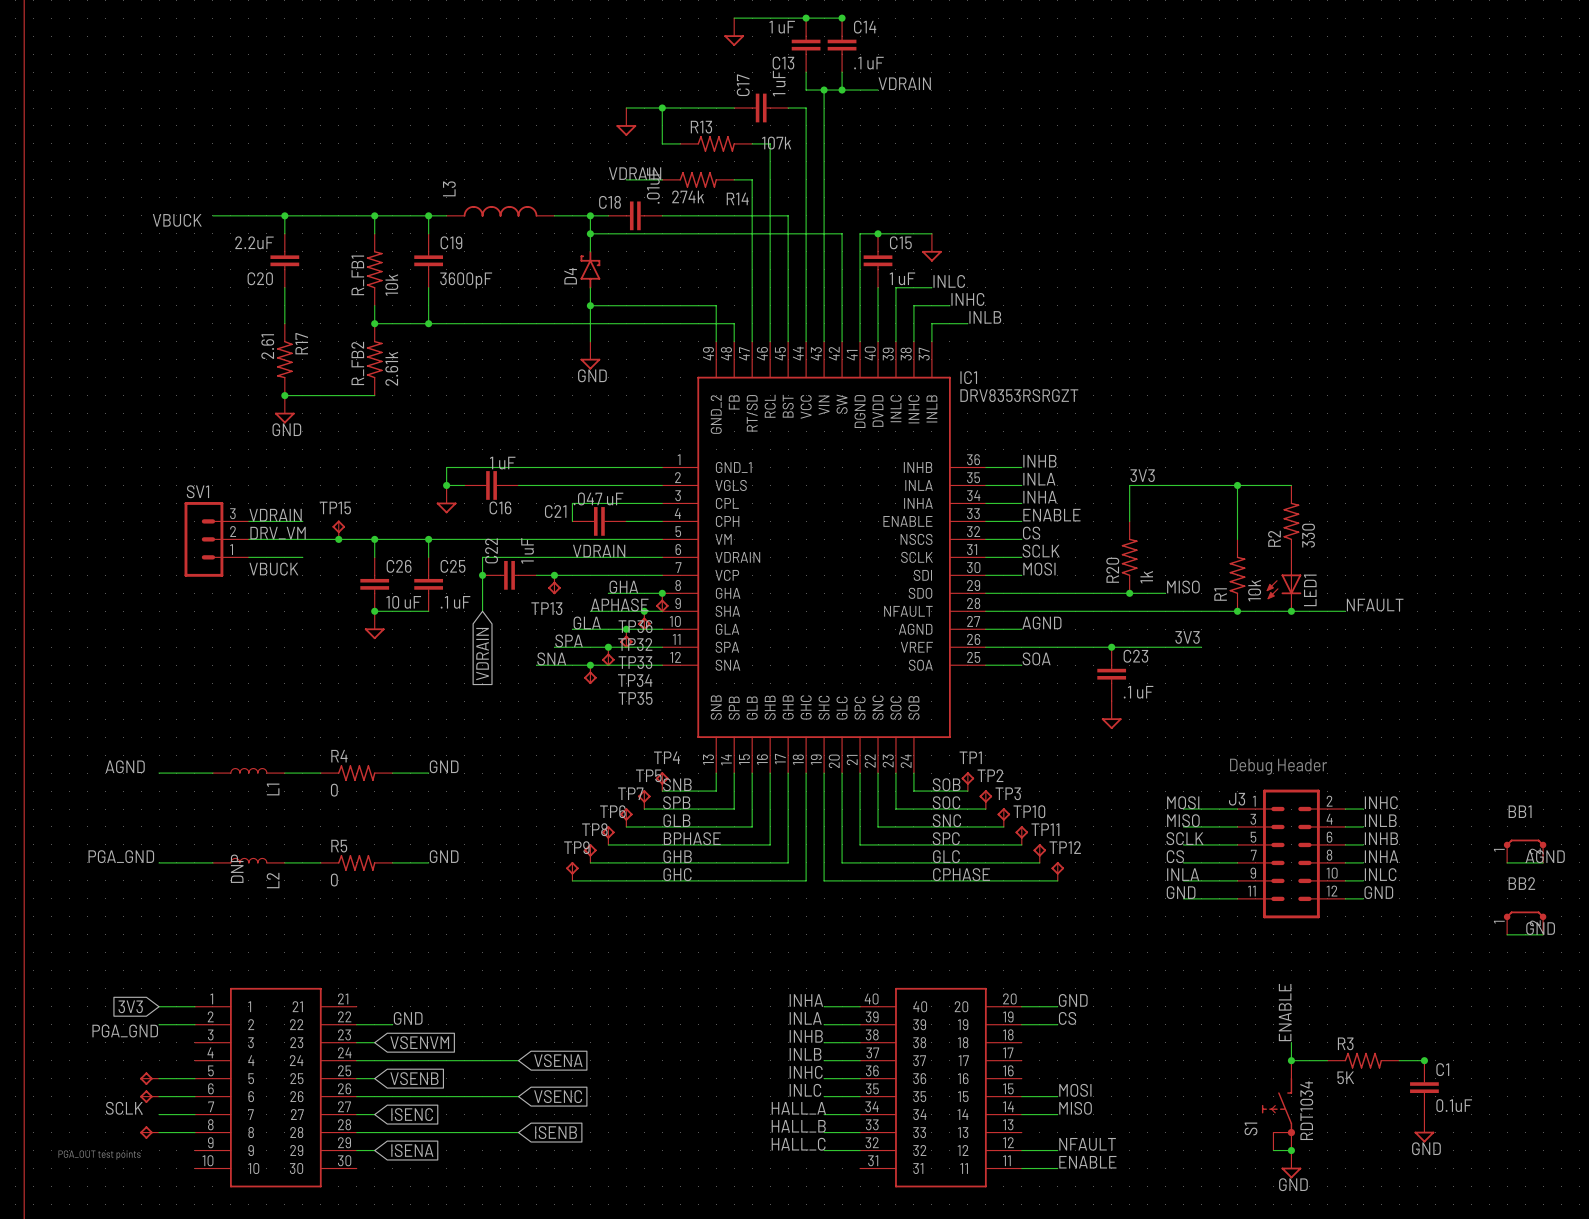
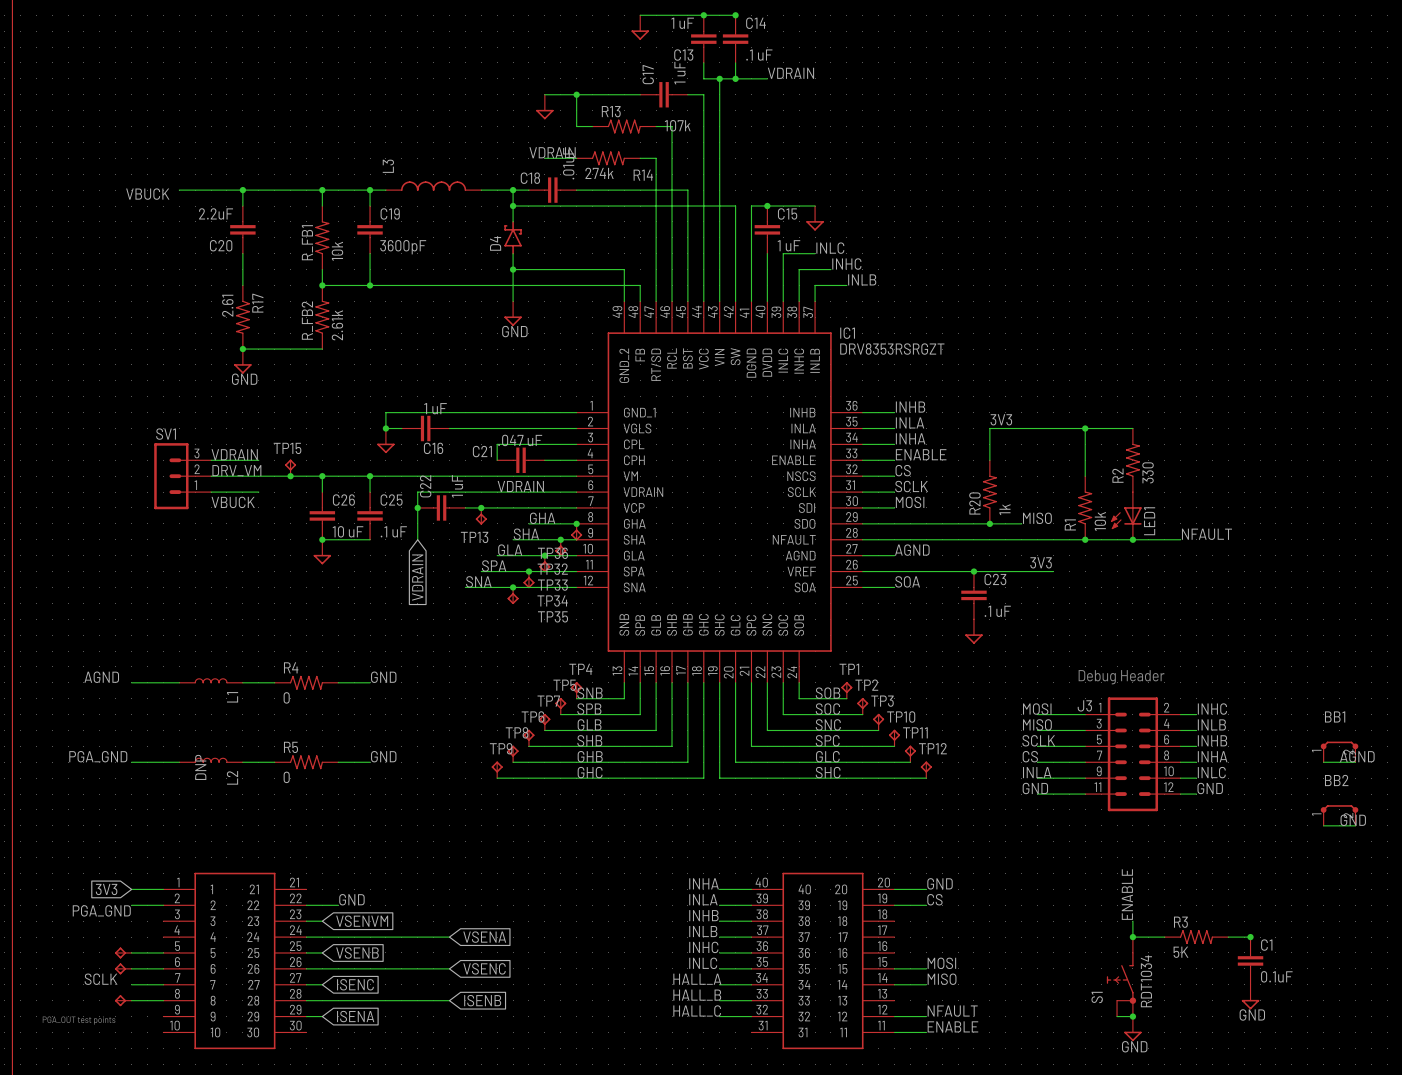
label: APHASE (619, 605) -> SHA (526, 534)
label: BPHASE (692, 838) -> SHB (589, 740)
label: CPHASE (961, 874) -> SHC (828, 772)

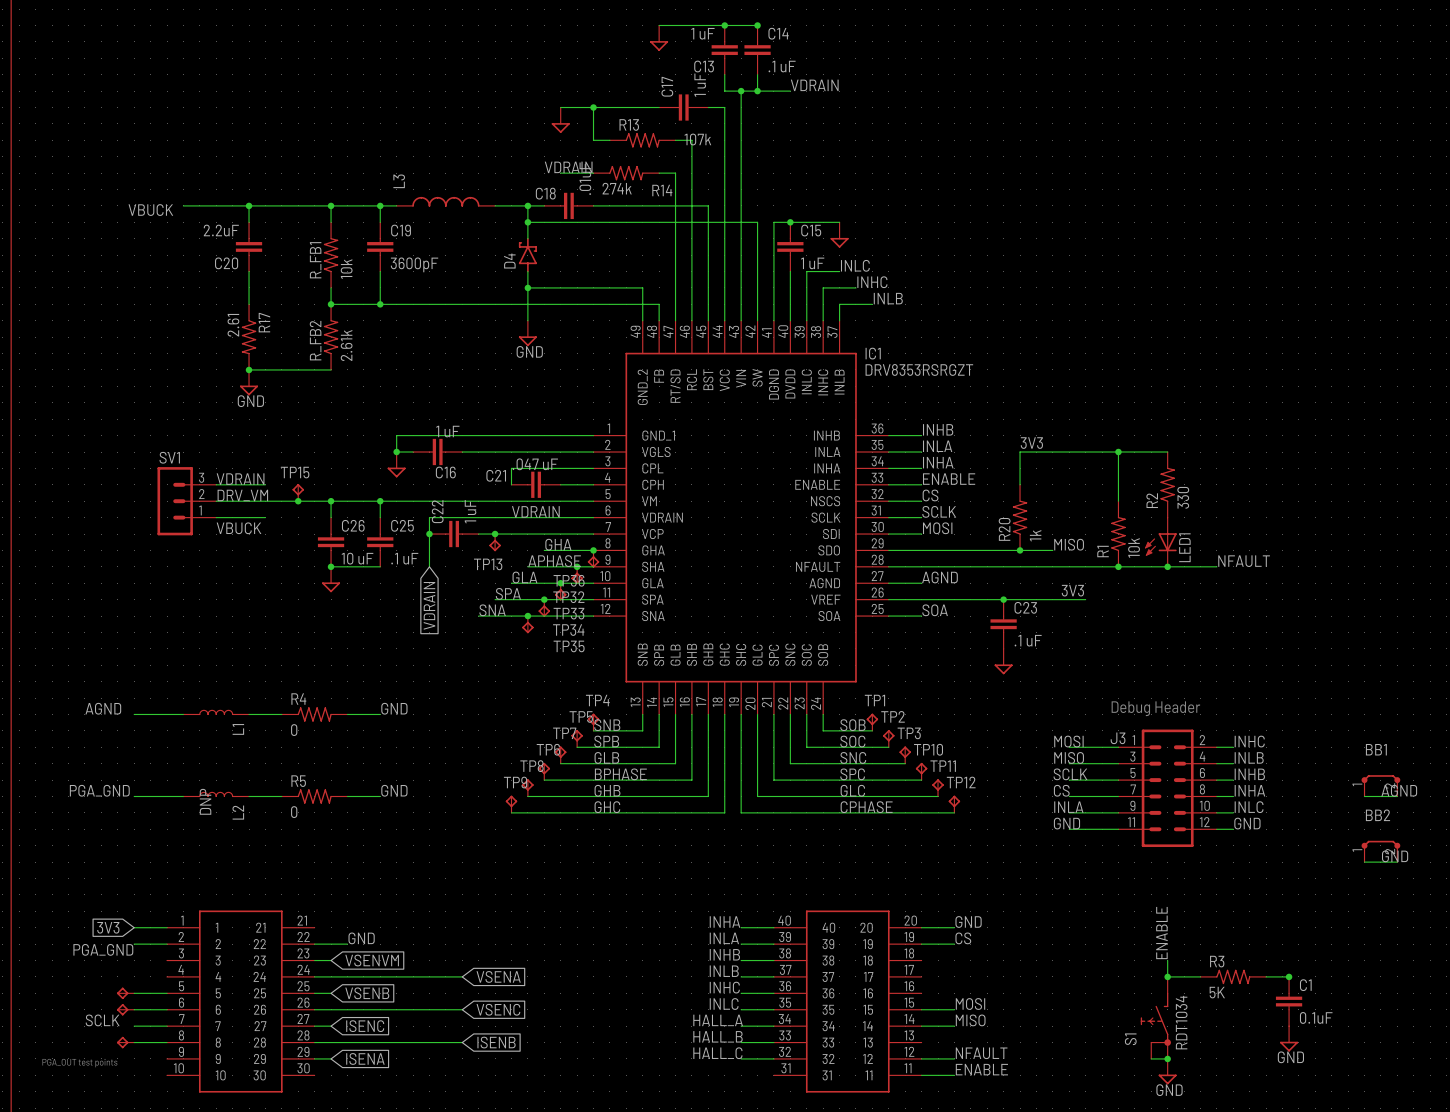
label: SHA (526, 534) -> APHASE (554, 561)
label: SHB (589, 740) -> BPHASE (620, 774)
label: SHC (828, 772) -> CPHASE (866, 807)

